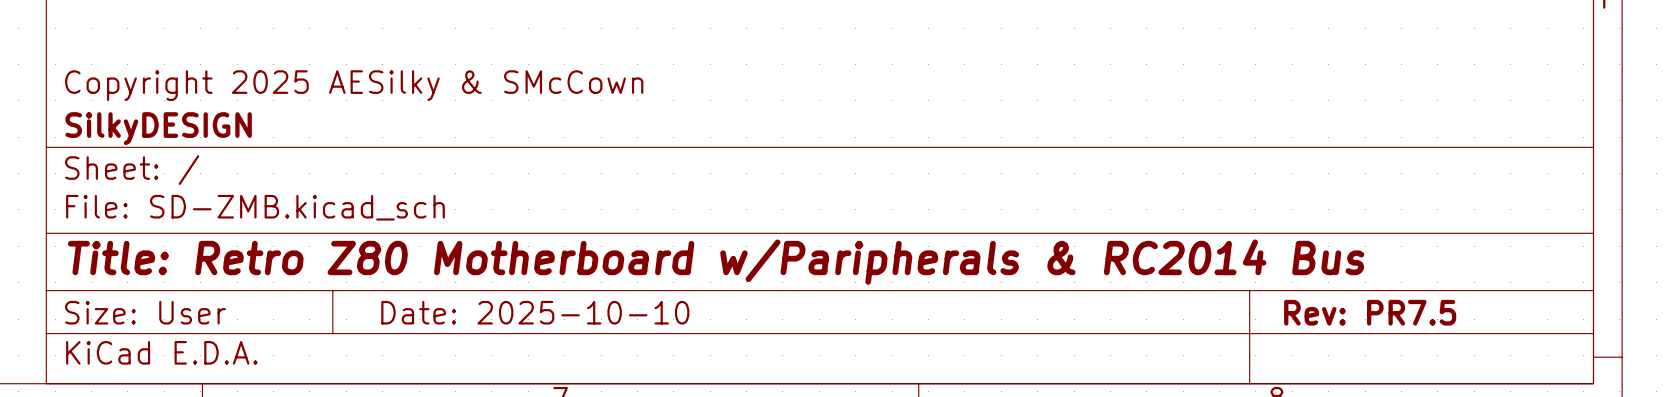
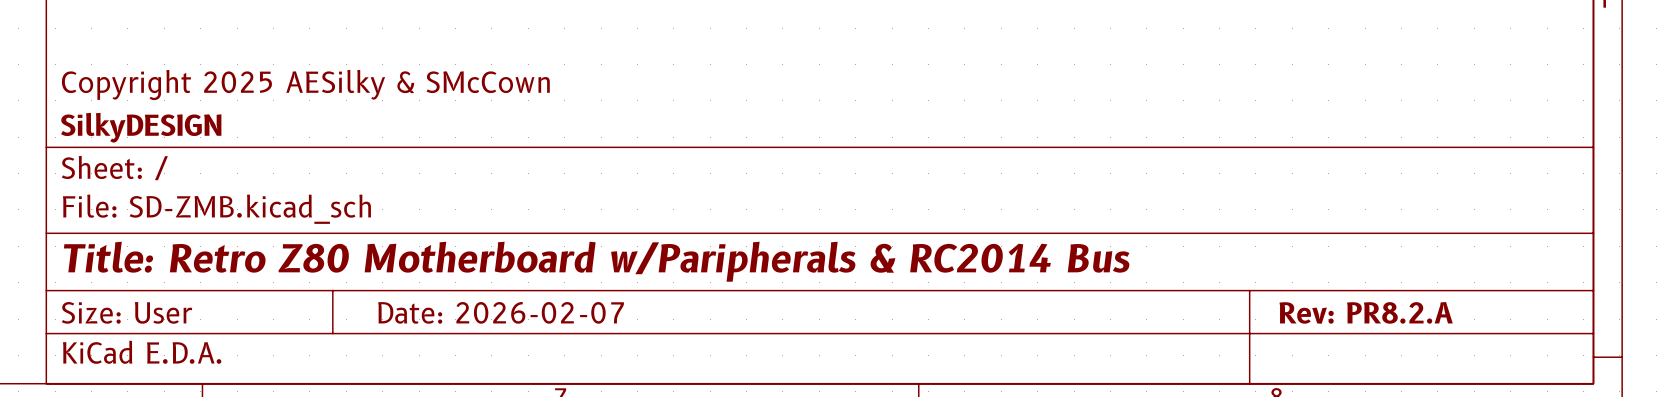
title block: Date: 2025-10-10 (535, 312) -> Date: 2026-02-07 (501, 312)
title block: Rev: PR7.5 (1370, 312) -> Rev: PR8.2.A (1366, 312)

